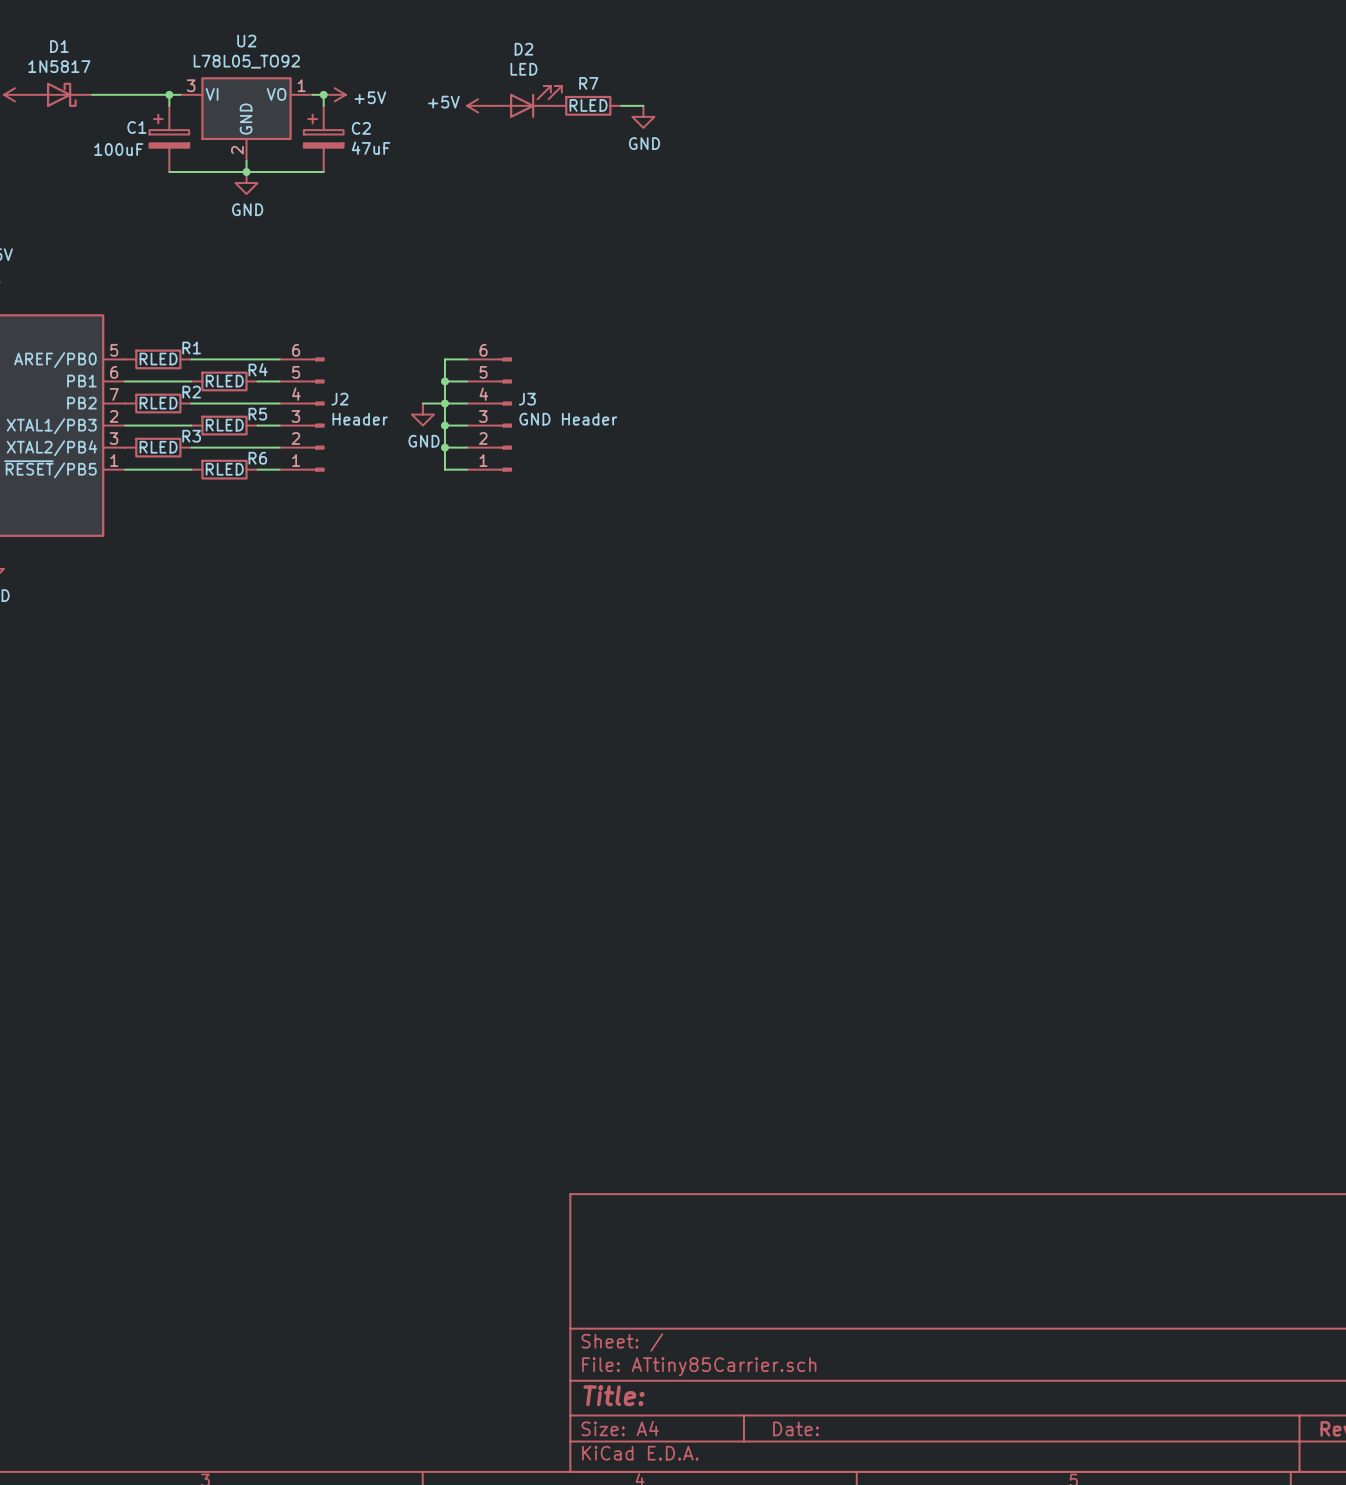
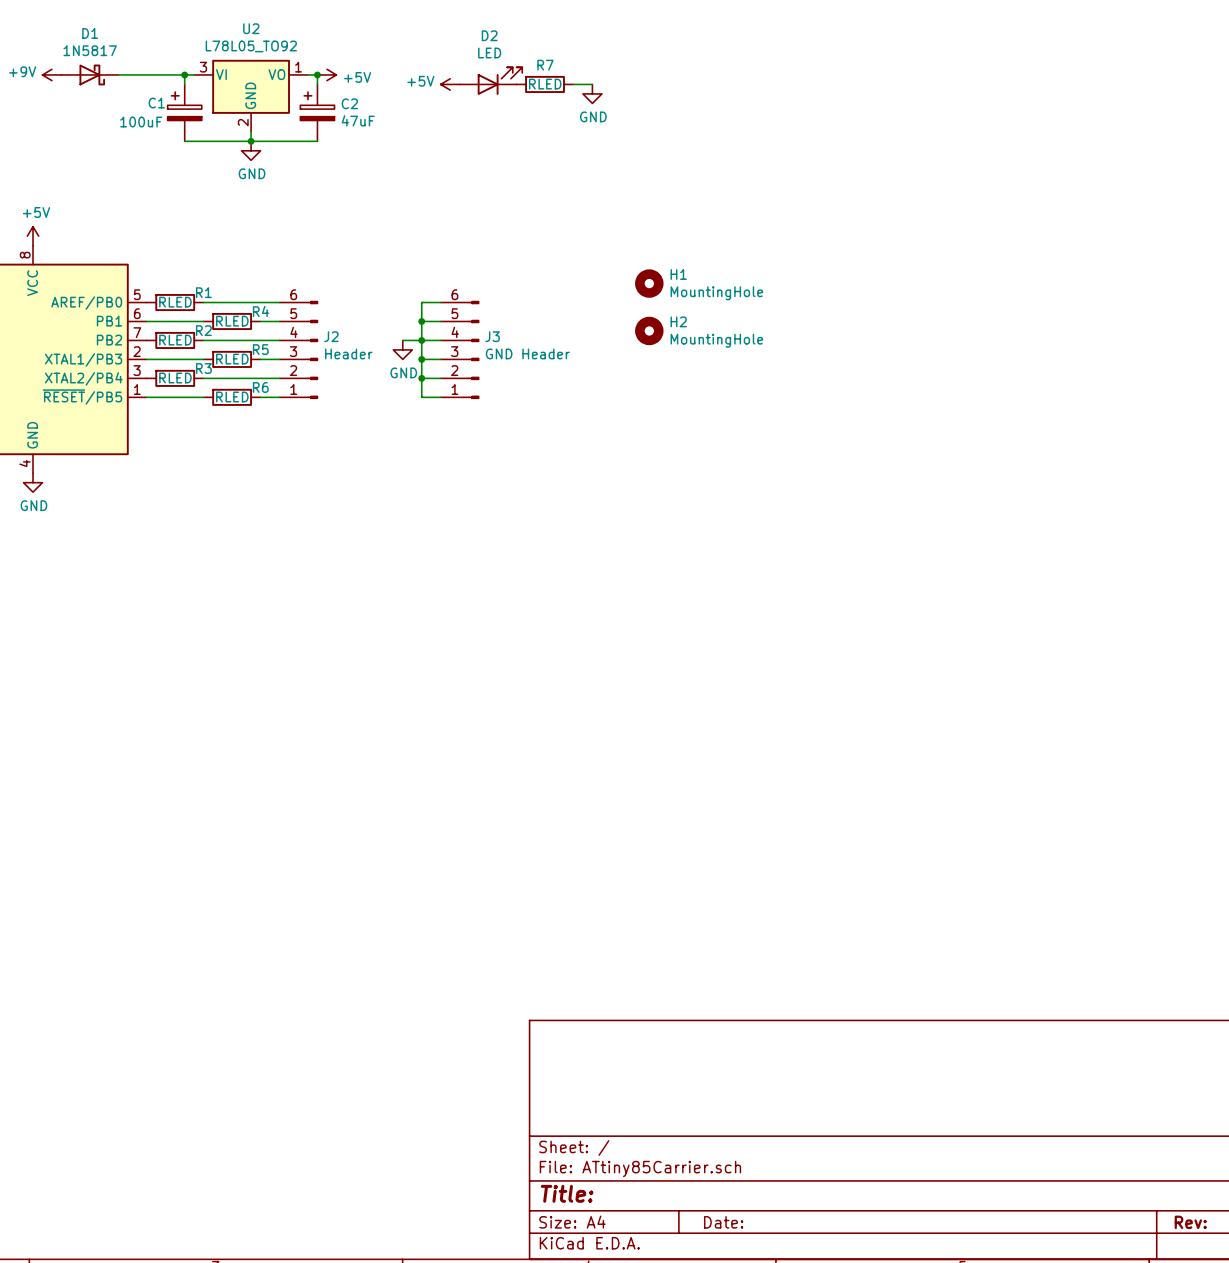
H1: none -> MountingHole (649, 283)
H2: none -> MountingHole (649, 330)

